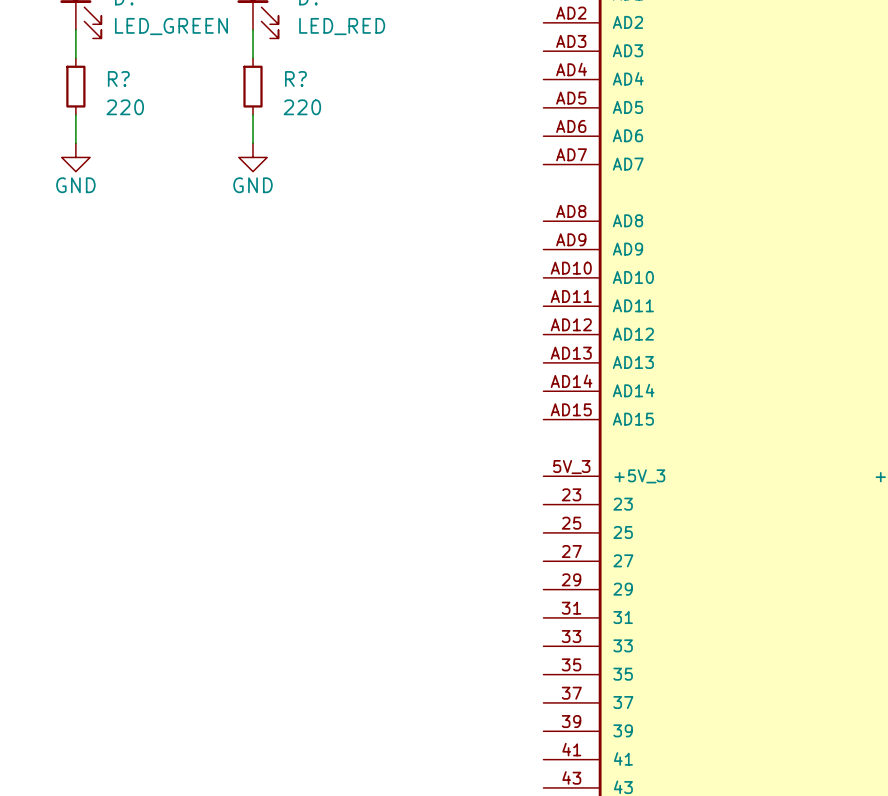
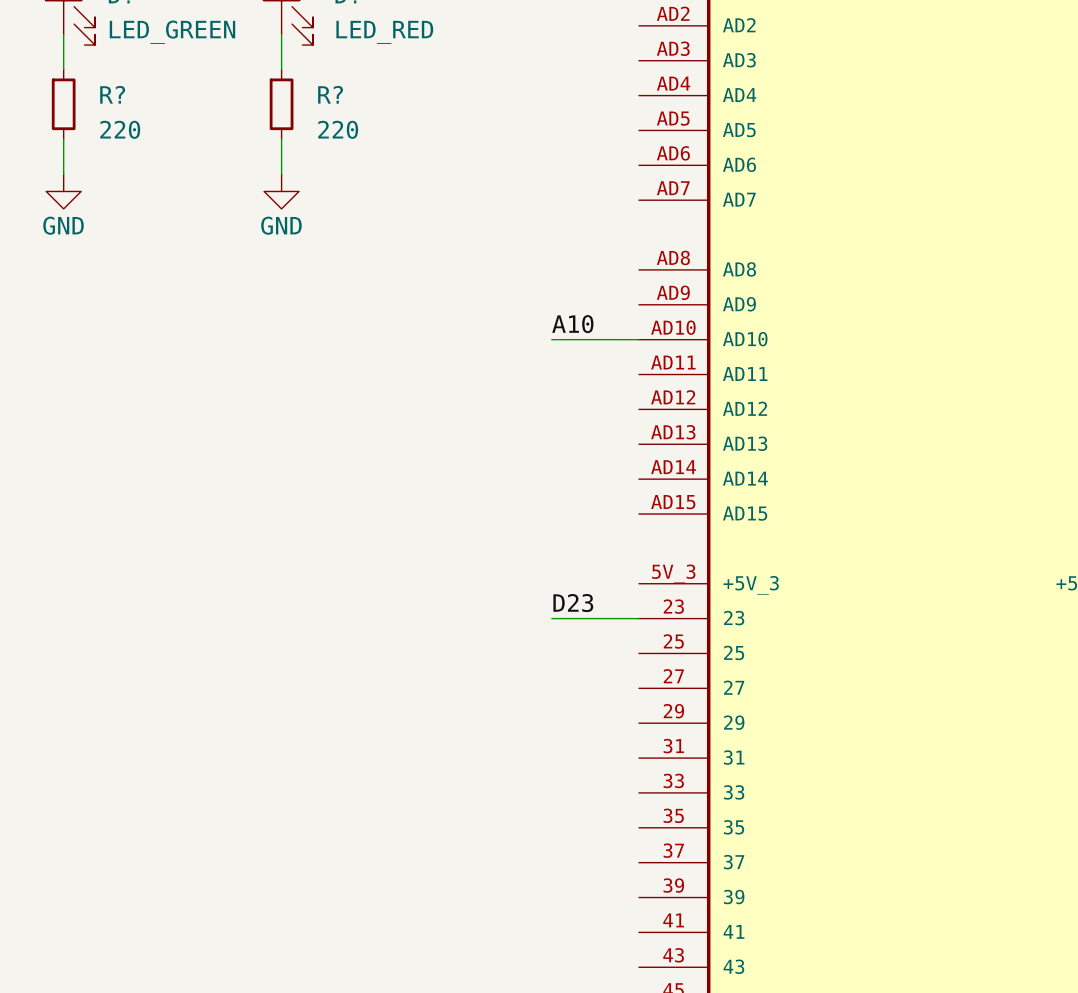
label: none -> A10 (572, 324)
wire: none -> (551, 339) (638, 339)
label: none -> D23 (573, 603)
wire: none -> (551, 618) (638, 618)

